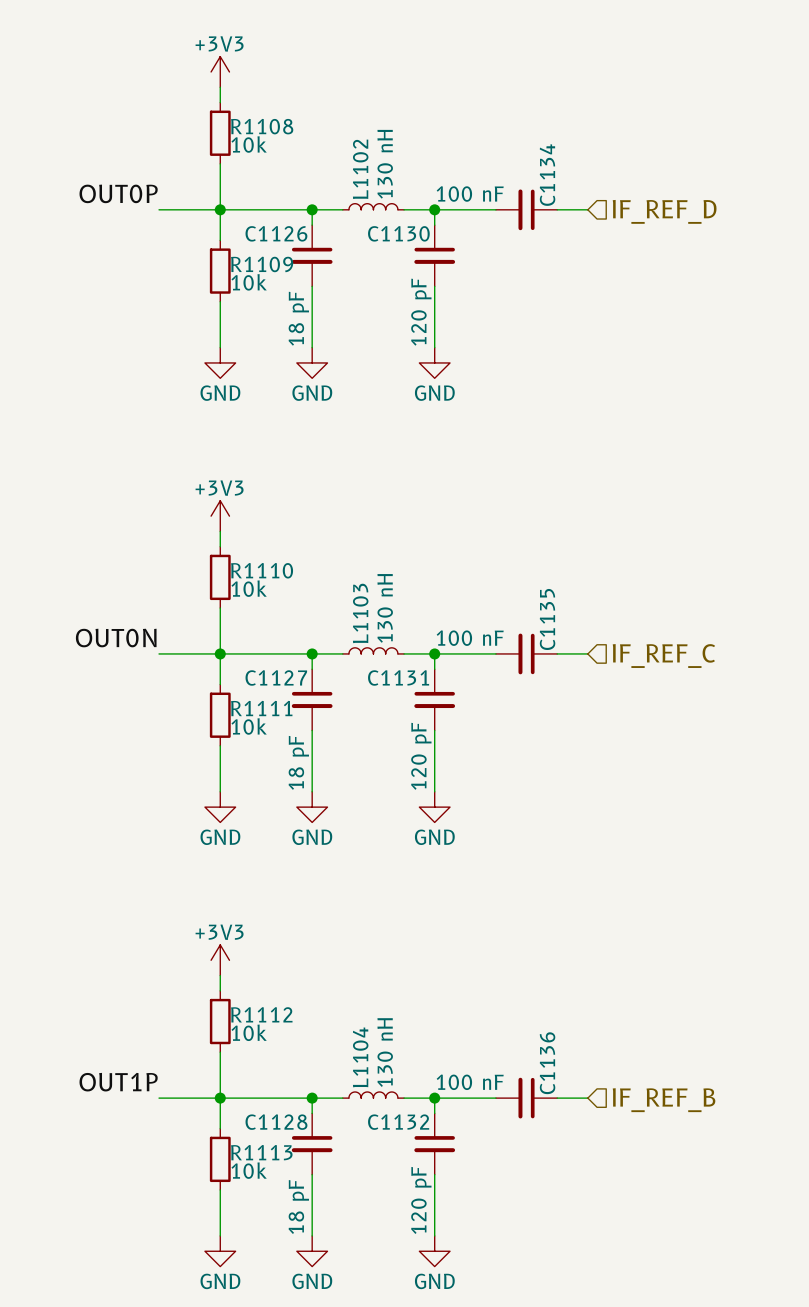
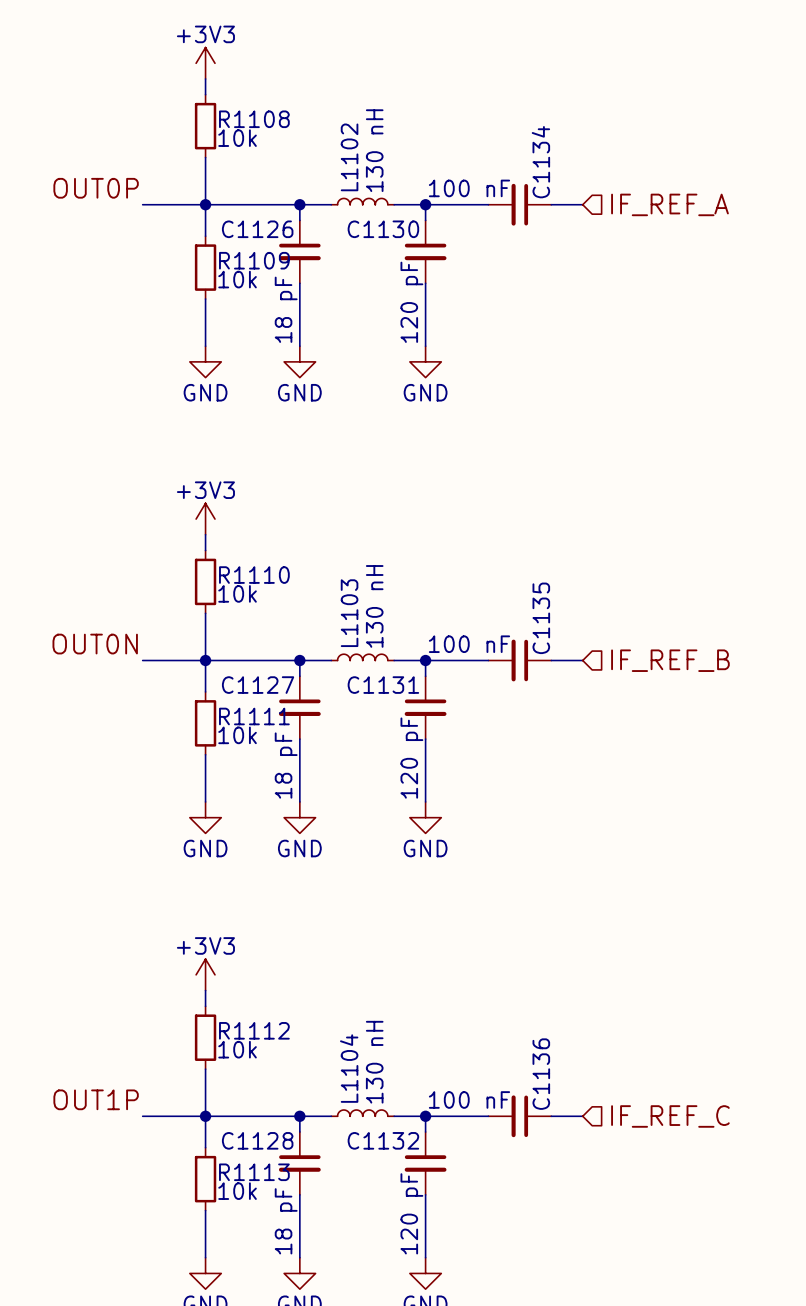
hierarchical label: IF_REF_D (664, 211) -> IF_REF_A (669, 204)
hierarchical label: IF_REF_C (663, 656) -> IF_REF_B (670, 660)
hierarchical label: IF_REF_B (664, 1100) -> IF_REF_C (670, 1116)

